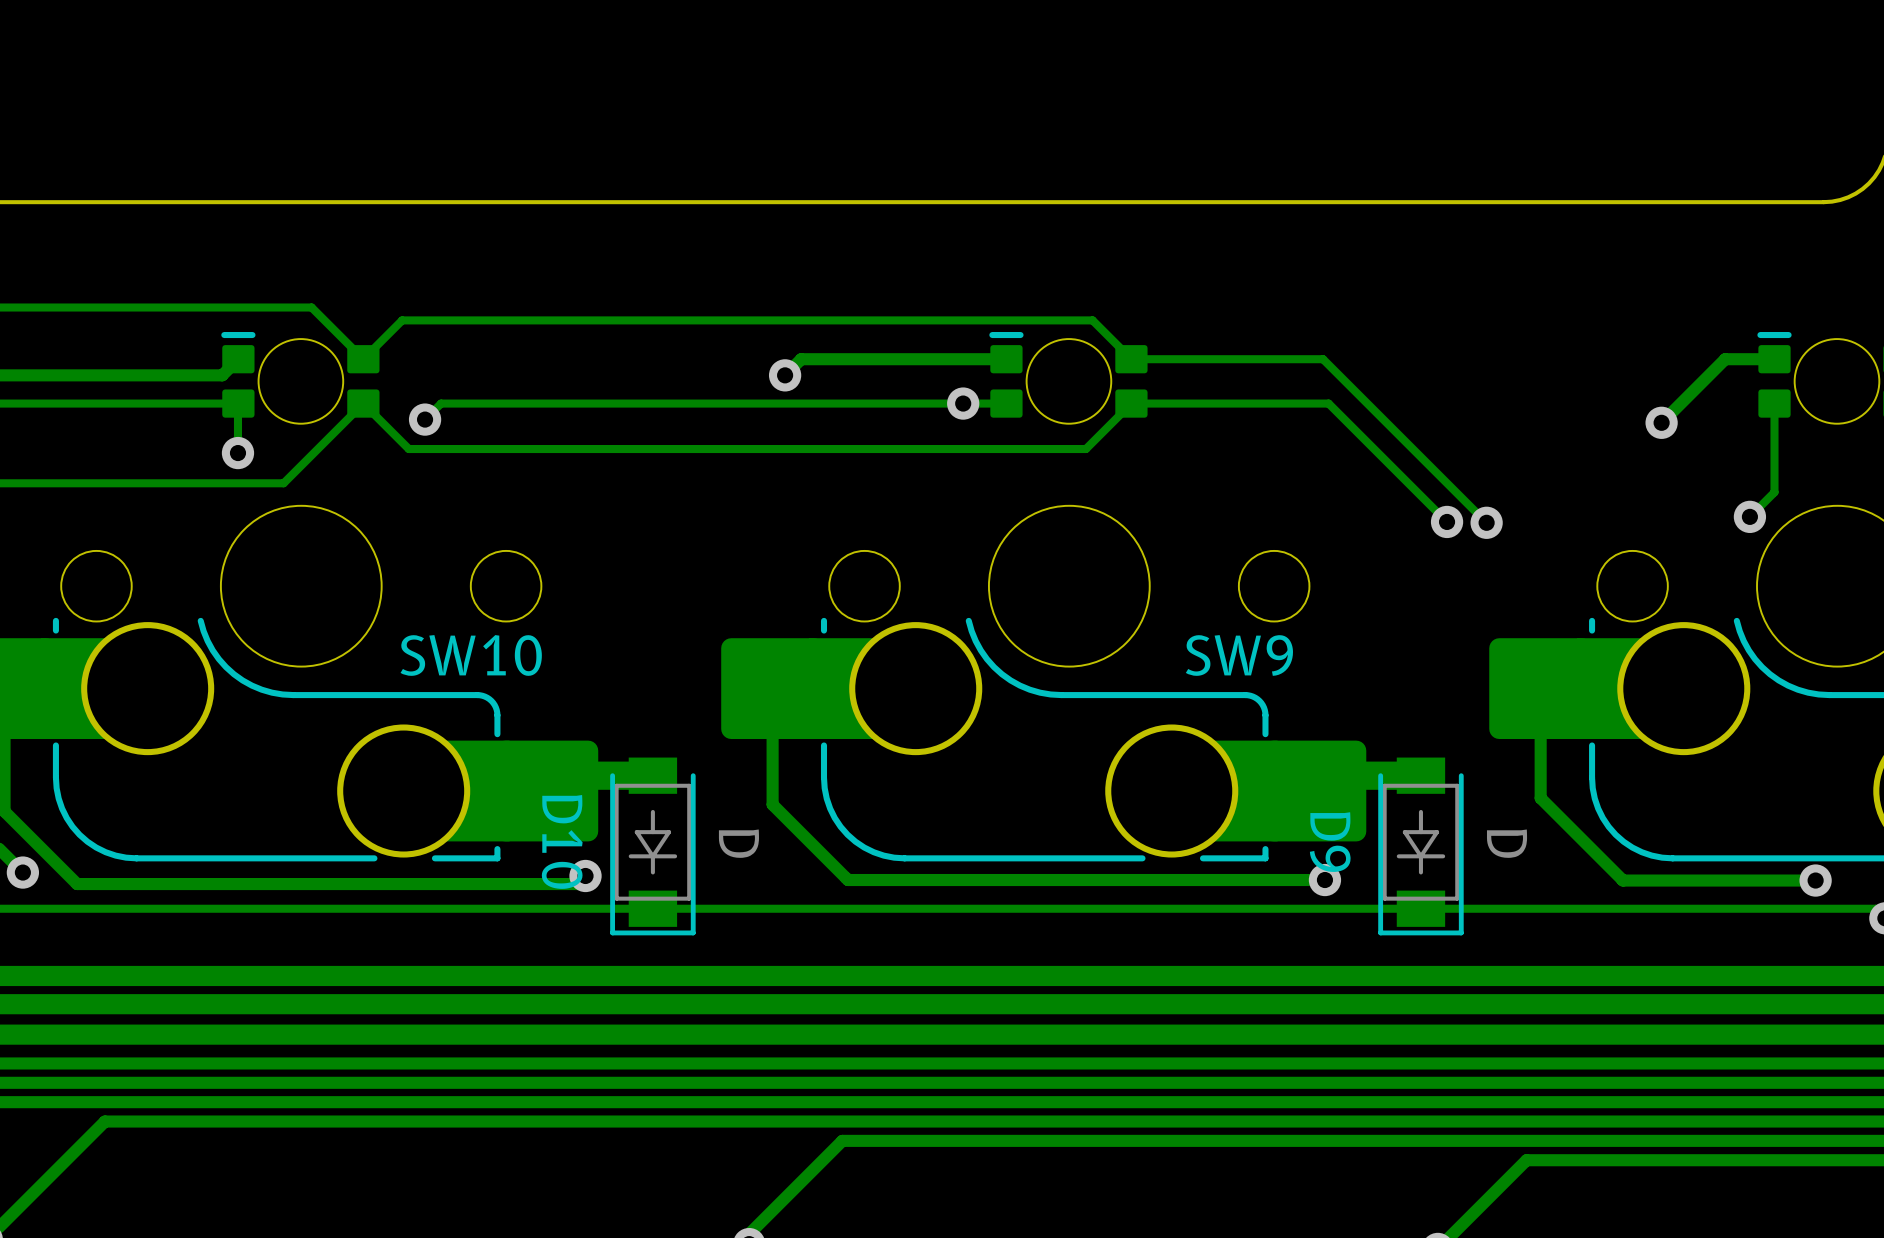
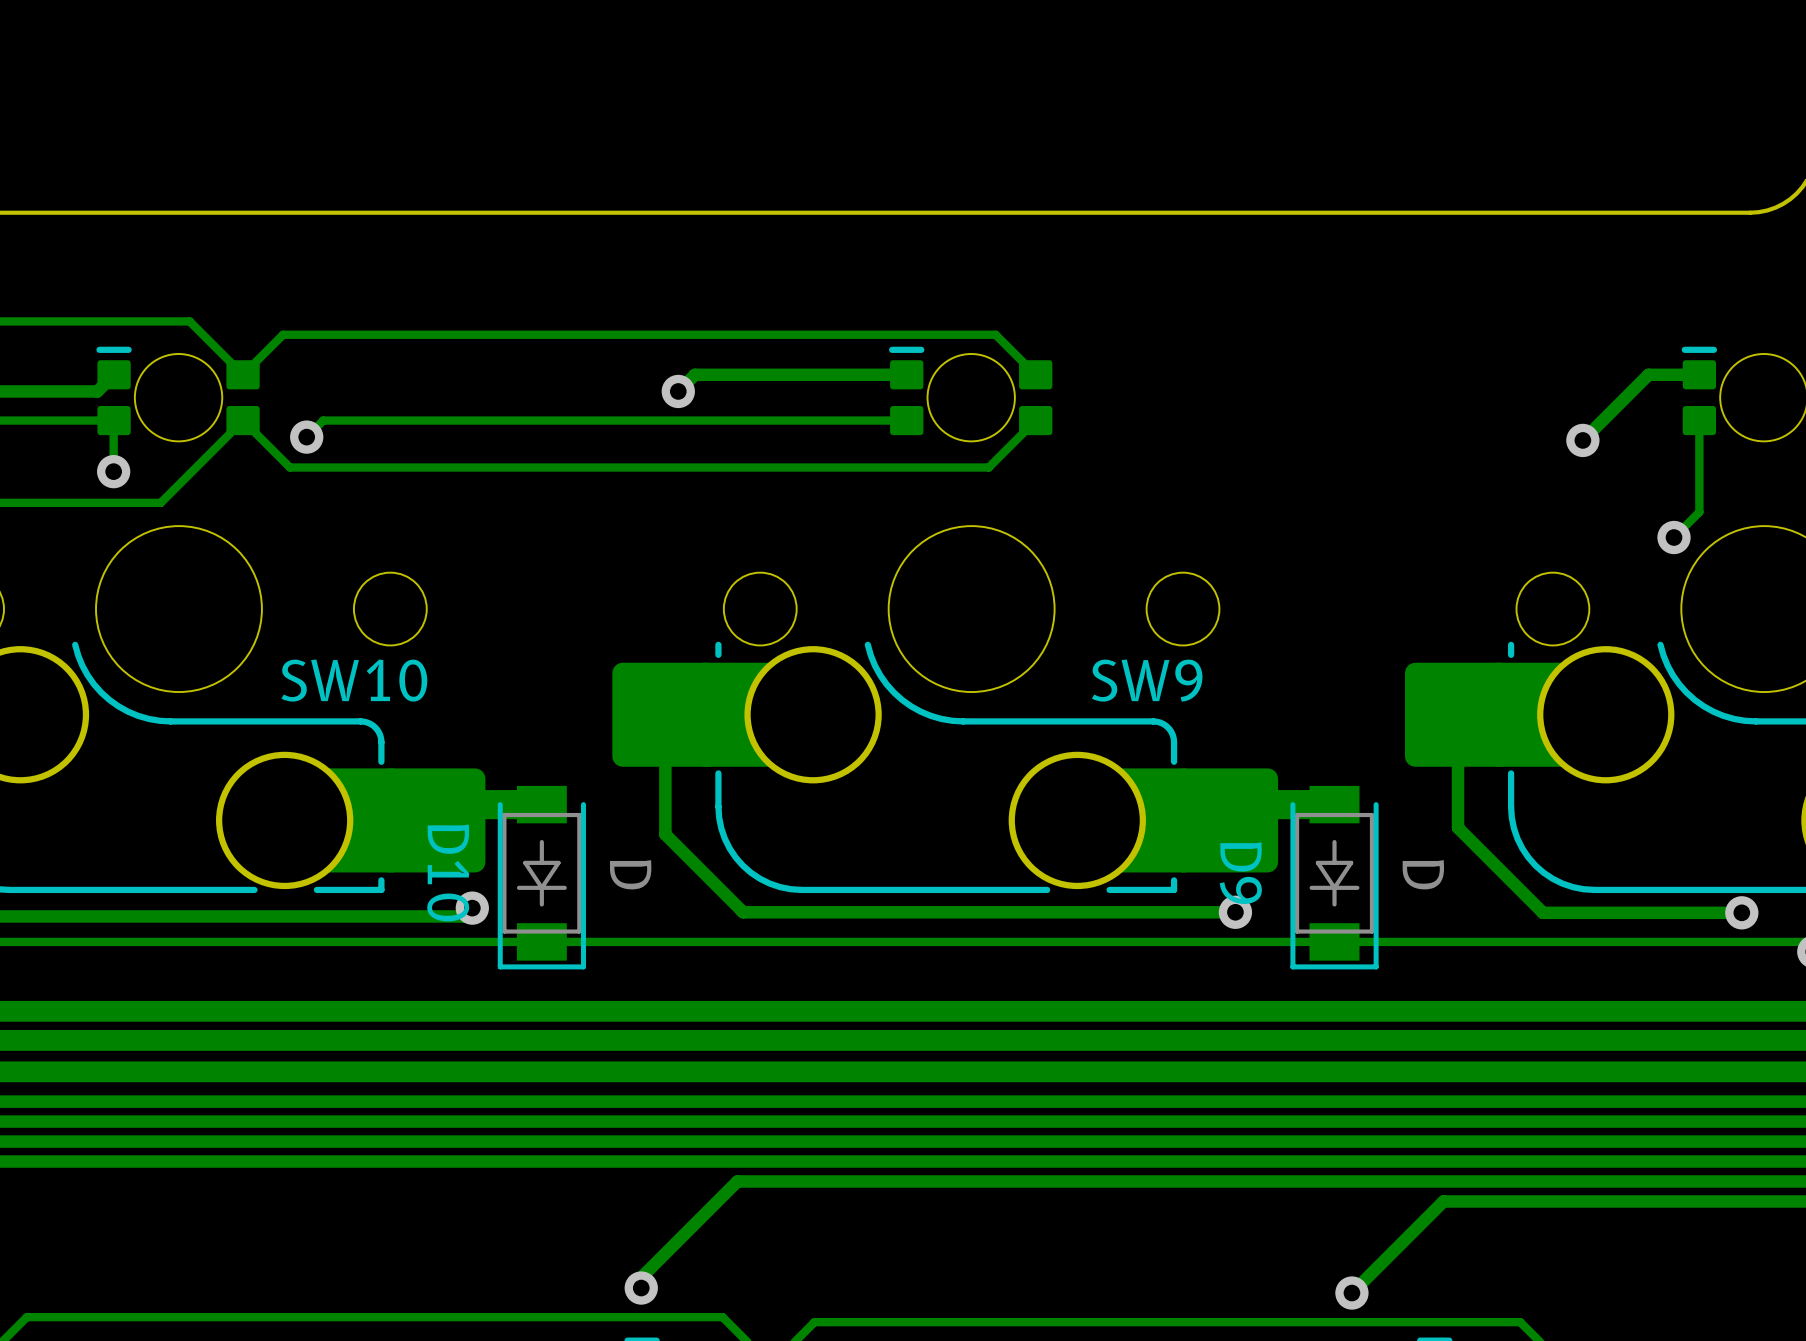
track: (1131, 359) (1323, 359) (1486, 522) -> none
via: (963, 403) -> none
track: (1131, 403) (1328, 403) (1447, 521) -> none
via: (1447, 521) -> none
via: (1486, 522) -> none

